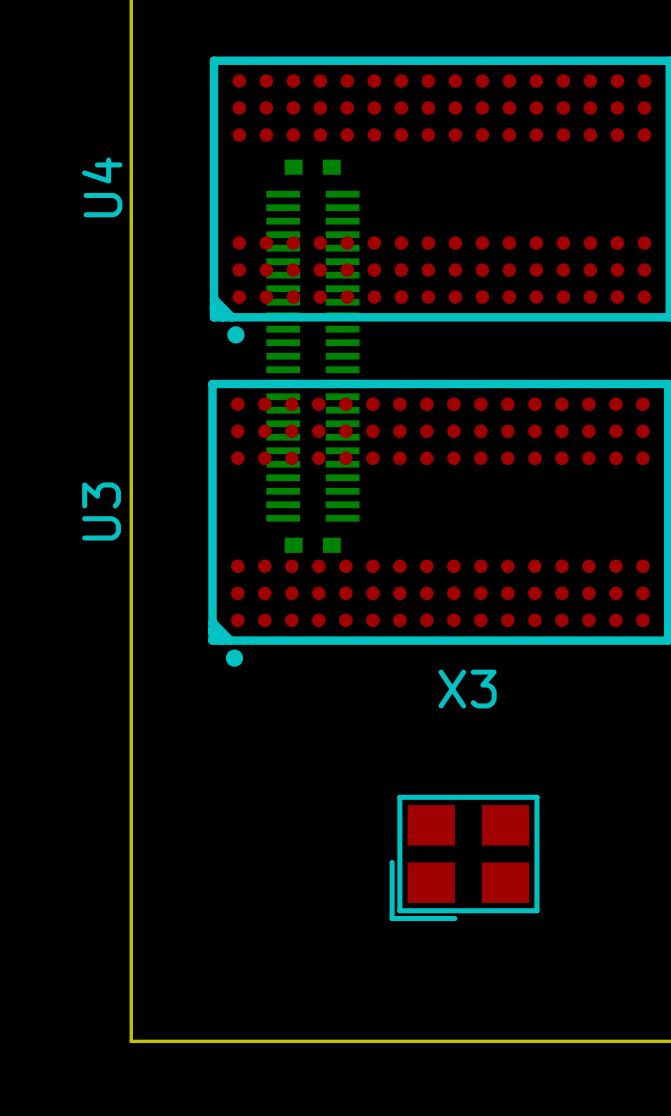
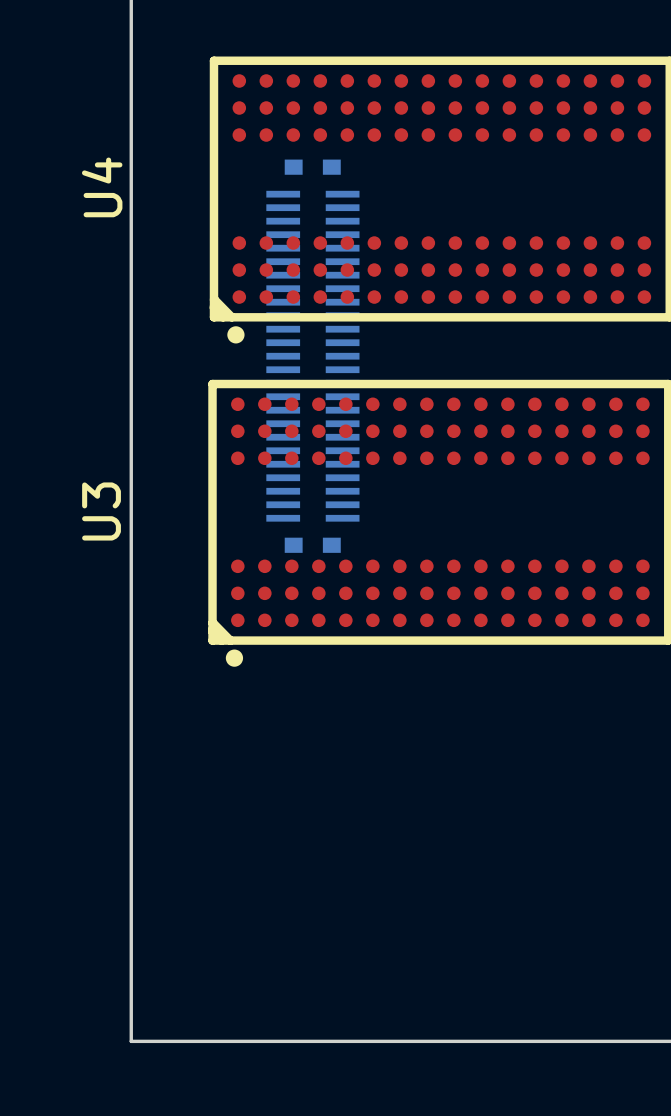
X3: (464, 857) -> none

